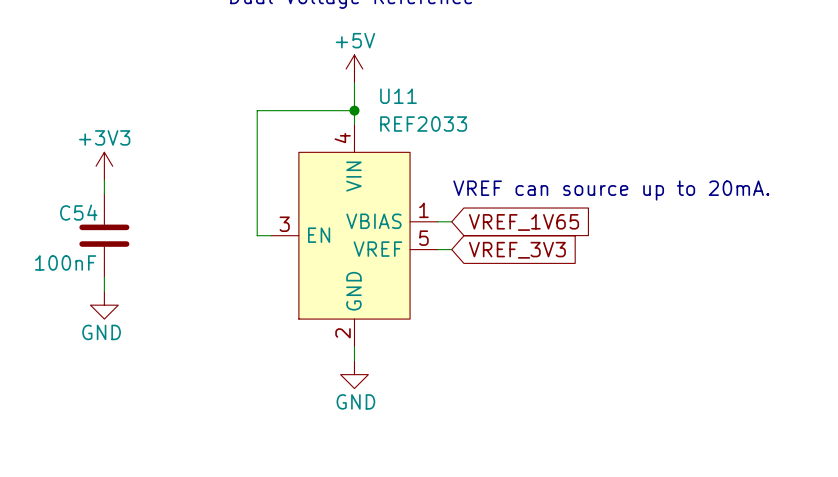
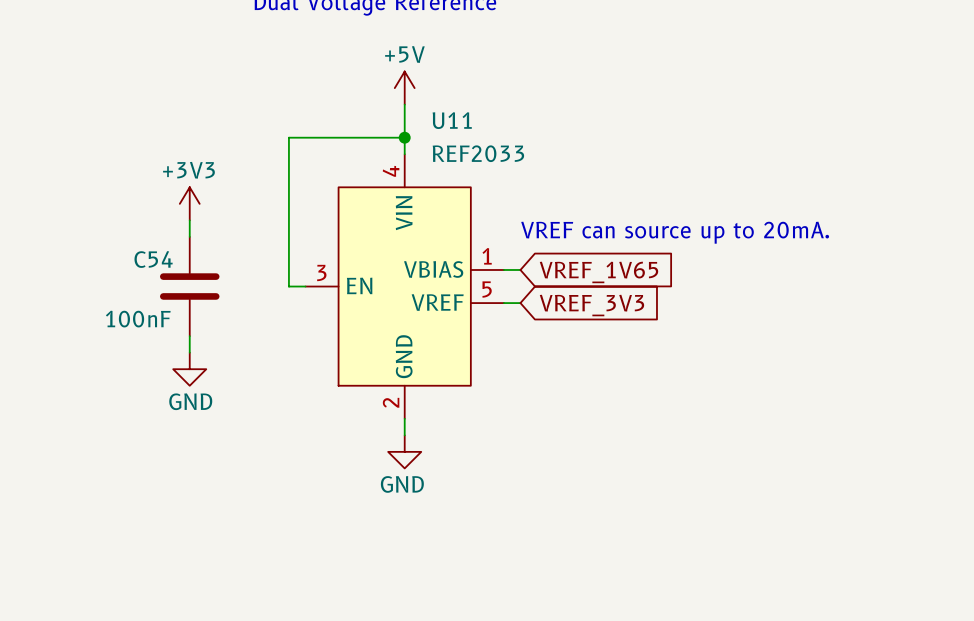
power symbol position: +3V3 (104, 166) -> +3V3 (189, 203)
wire: (104, 180) (104, 194) -> (189, 220) (189, 236)
C54 position: (104, 235) -> (189, 286)
wire: (104, 277) (104, 291) -> (189, 336) (189, 352)
power symbol position: GND (104, 305) -> GND (189, 369)

